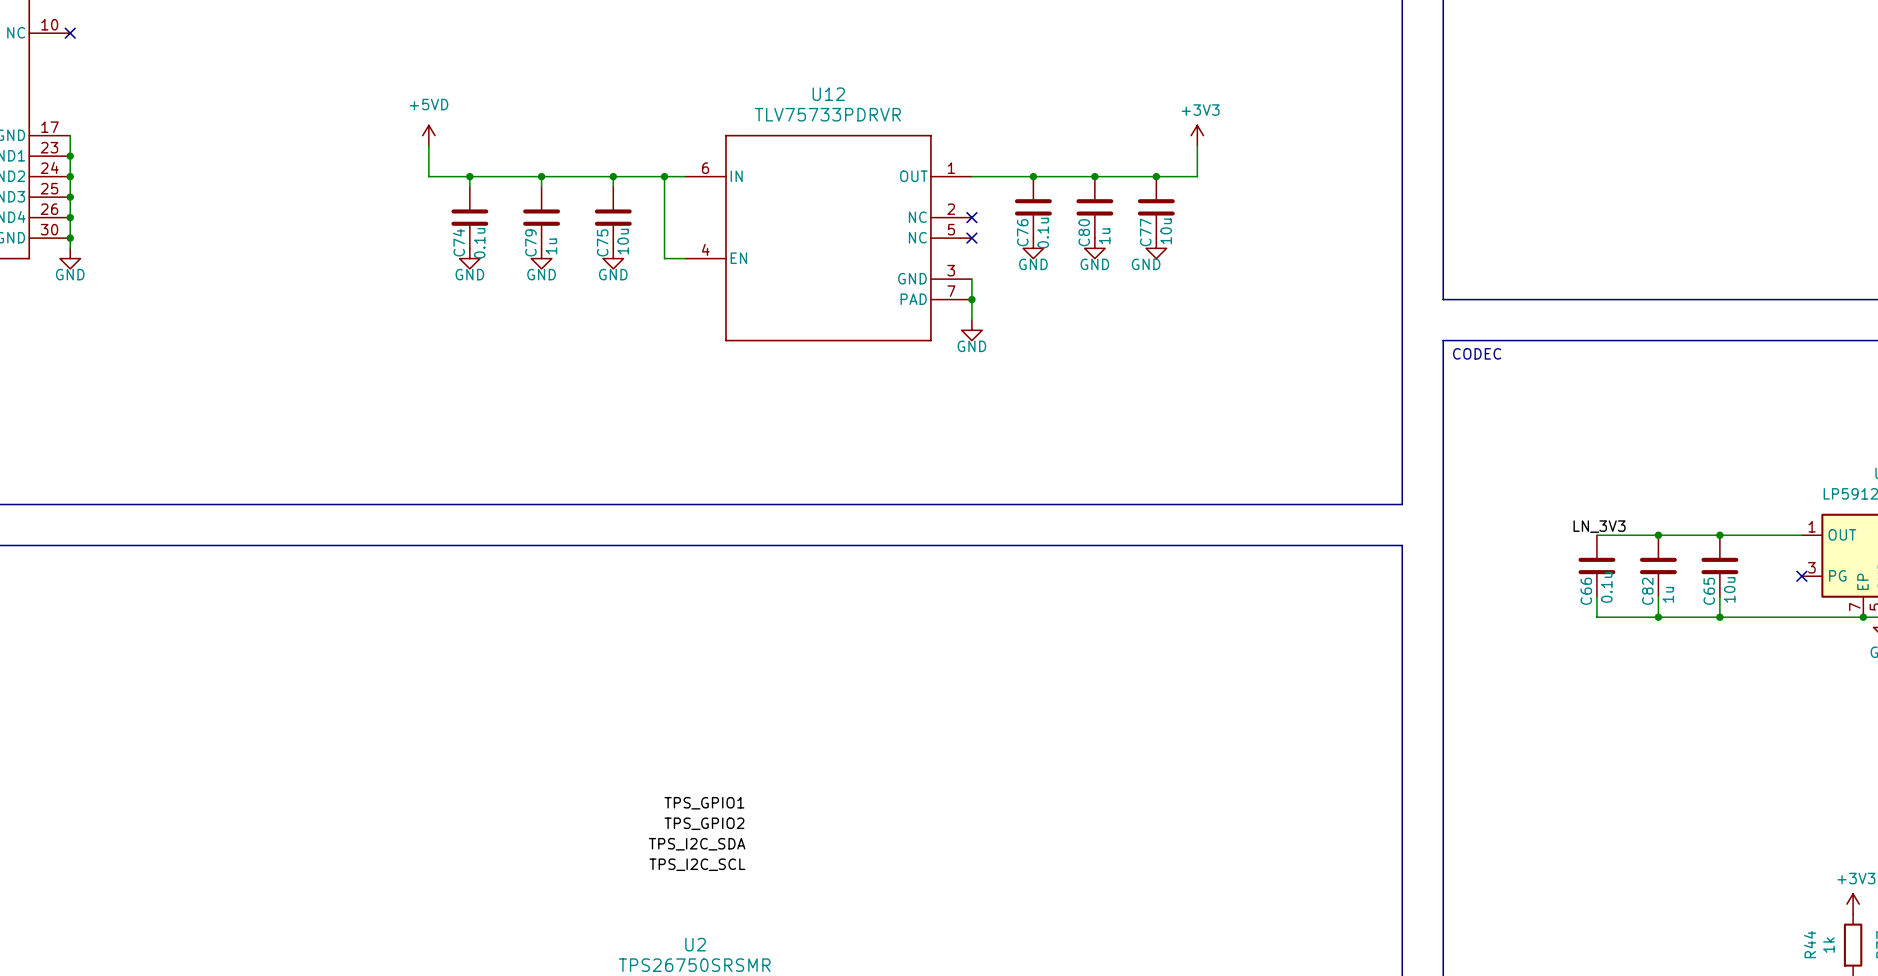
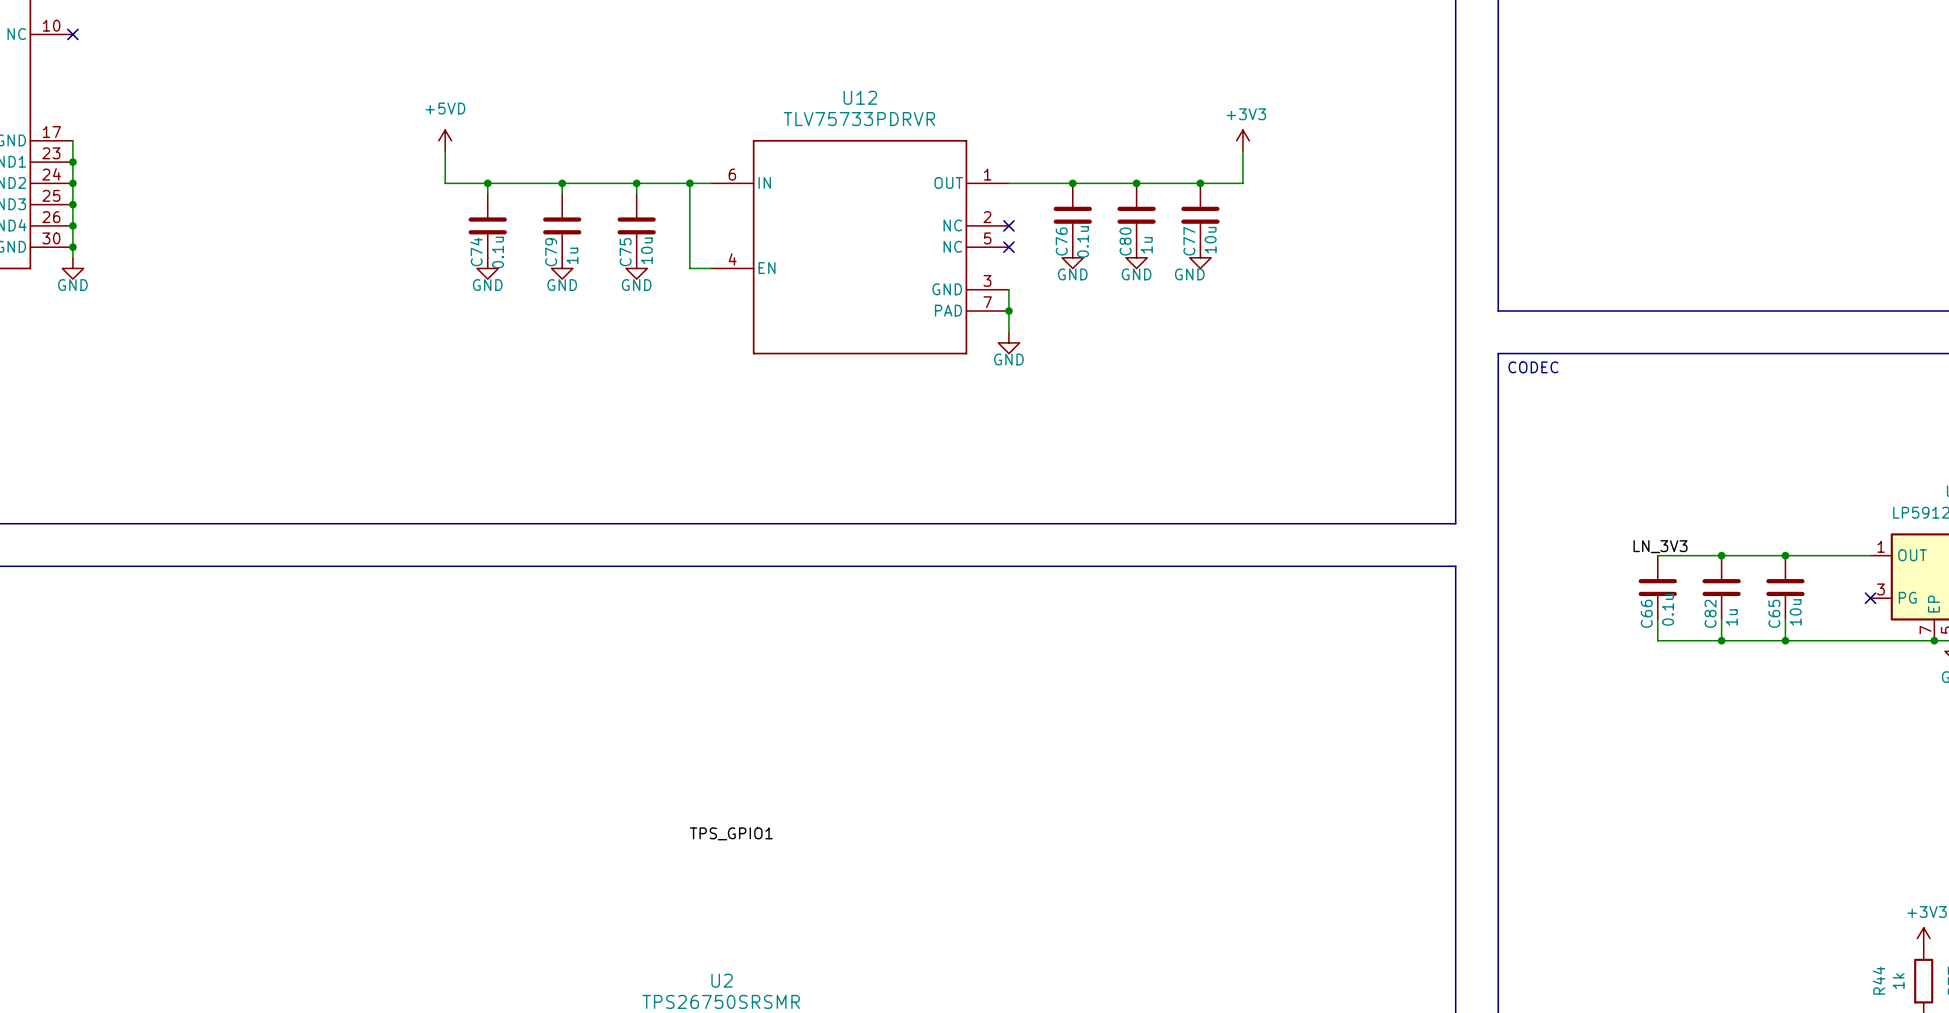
label: TPS_GPIO2 (704, 823) -> none
label: TPS_I2C_SDA (697, 844) -> none
label: TPS_I2C_SCL (697, 864) -> none

